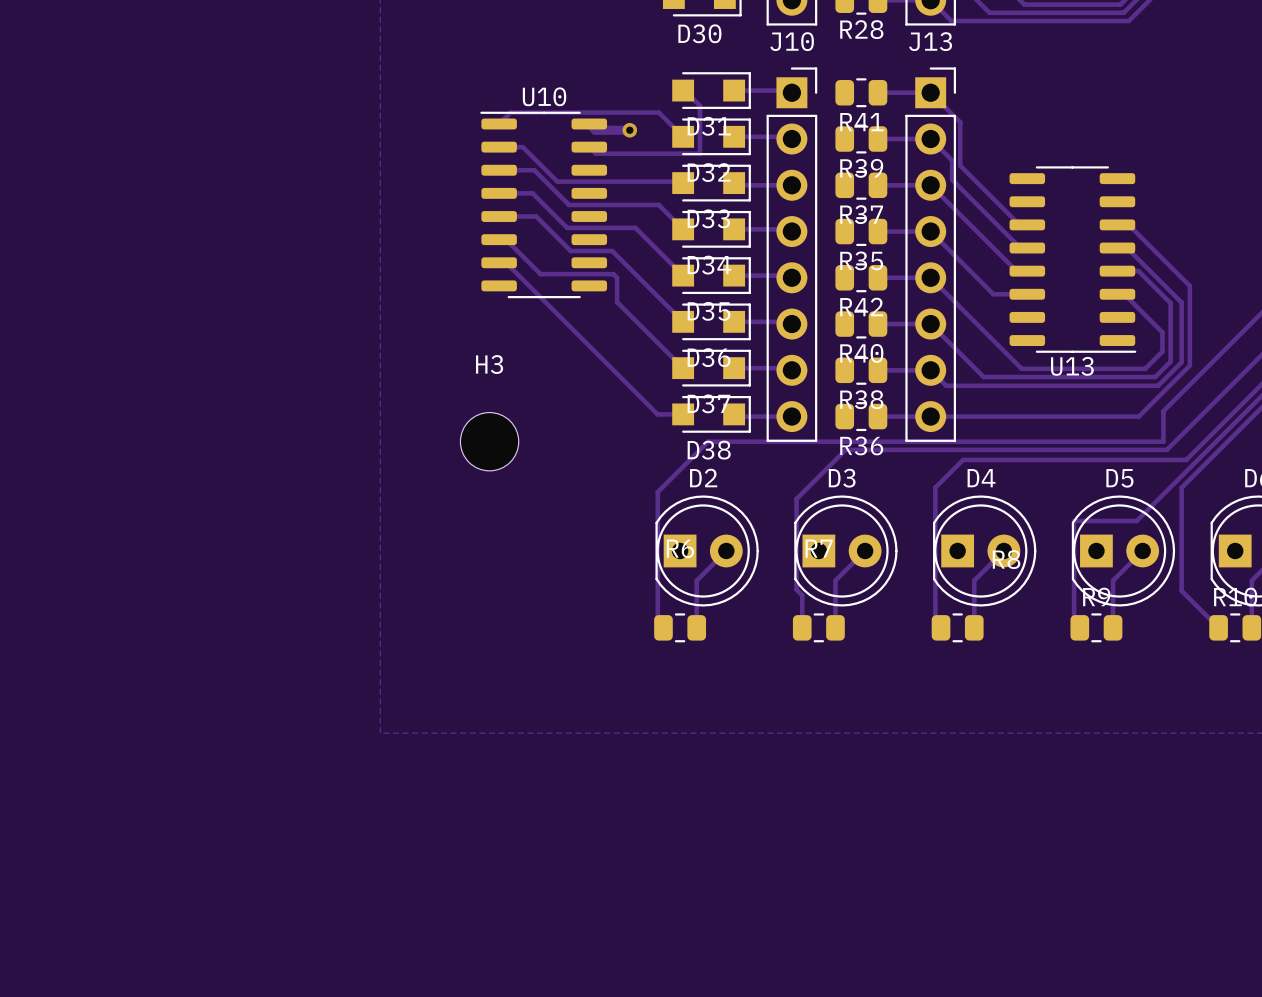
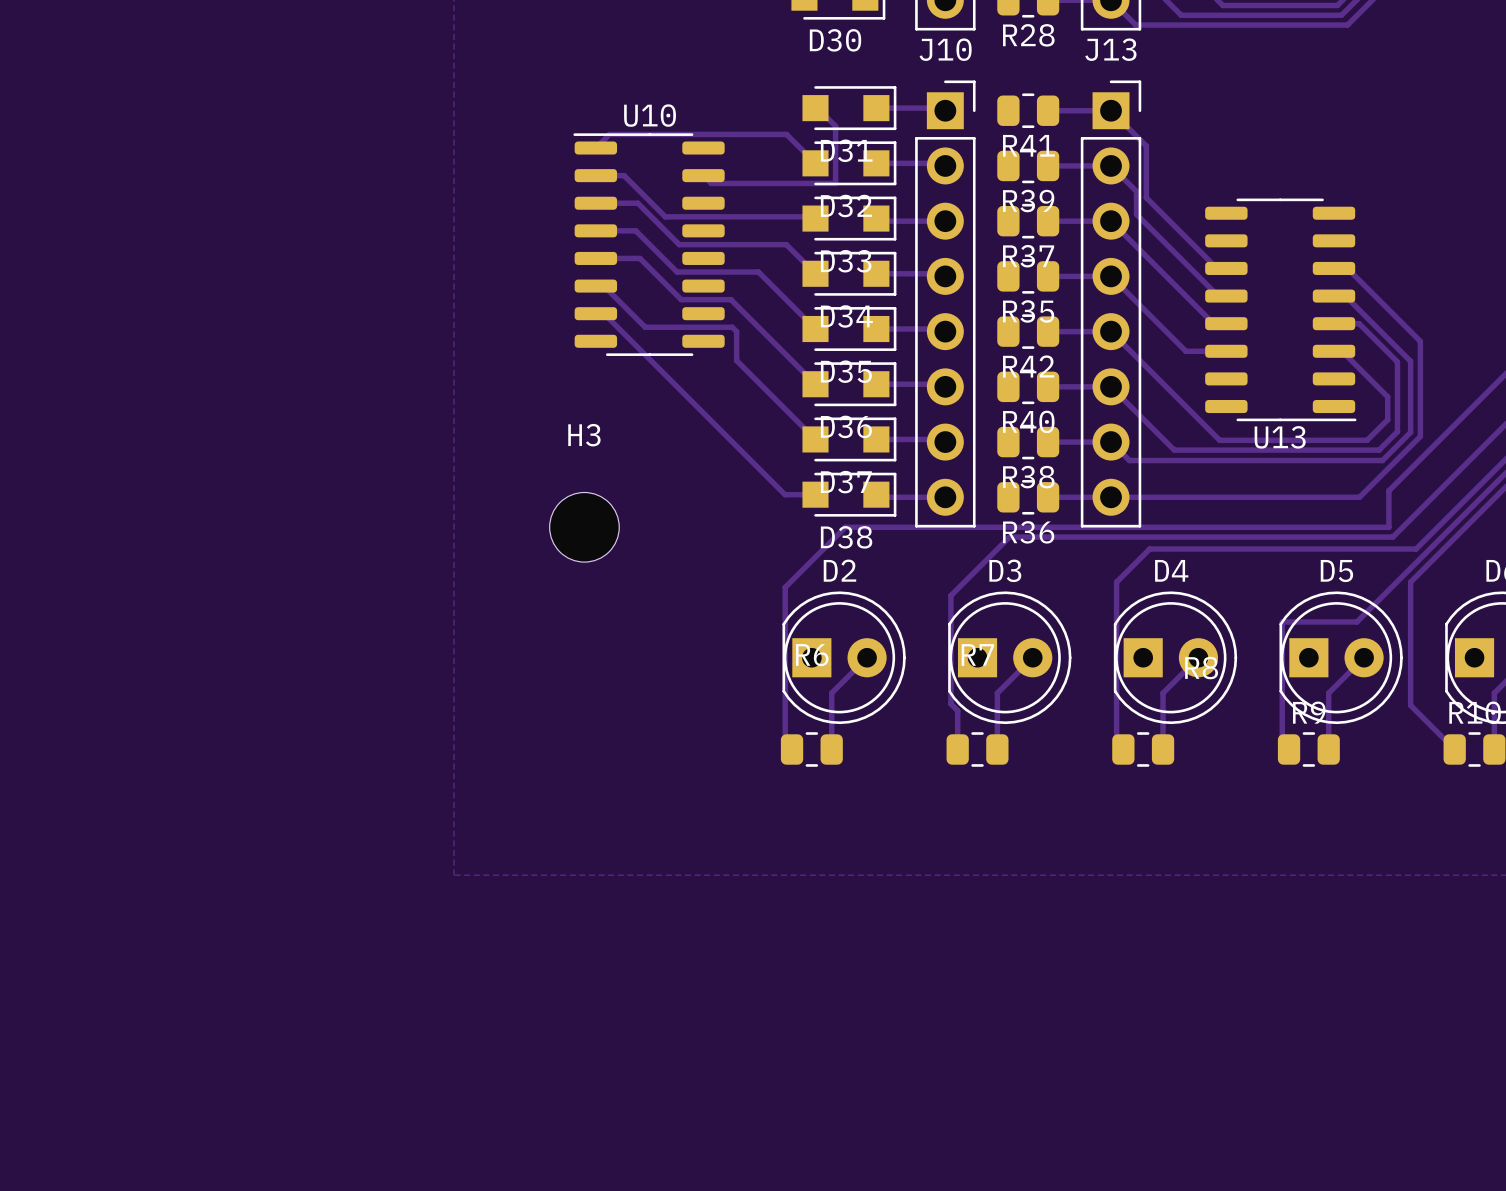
track: (589, 123) (595, 130) (629, 130) -> none
via: (629, 130) -> none

